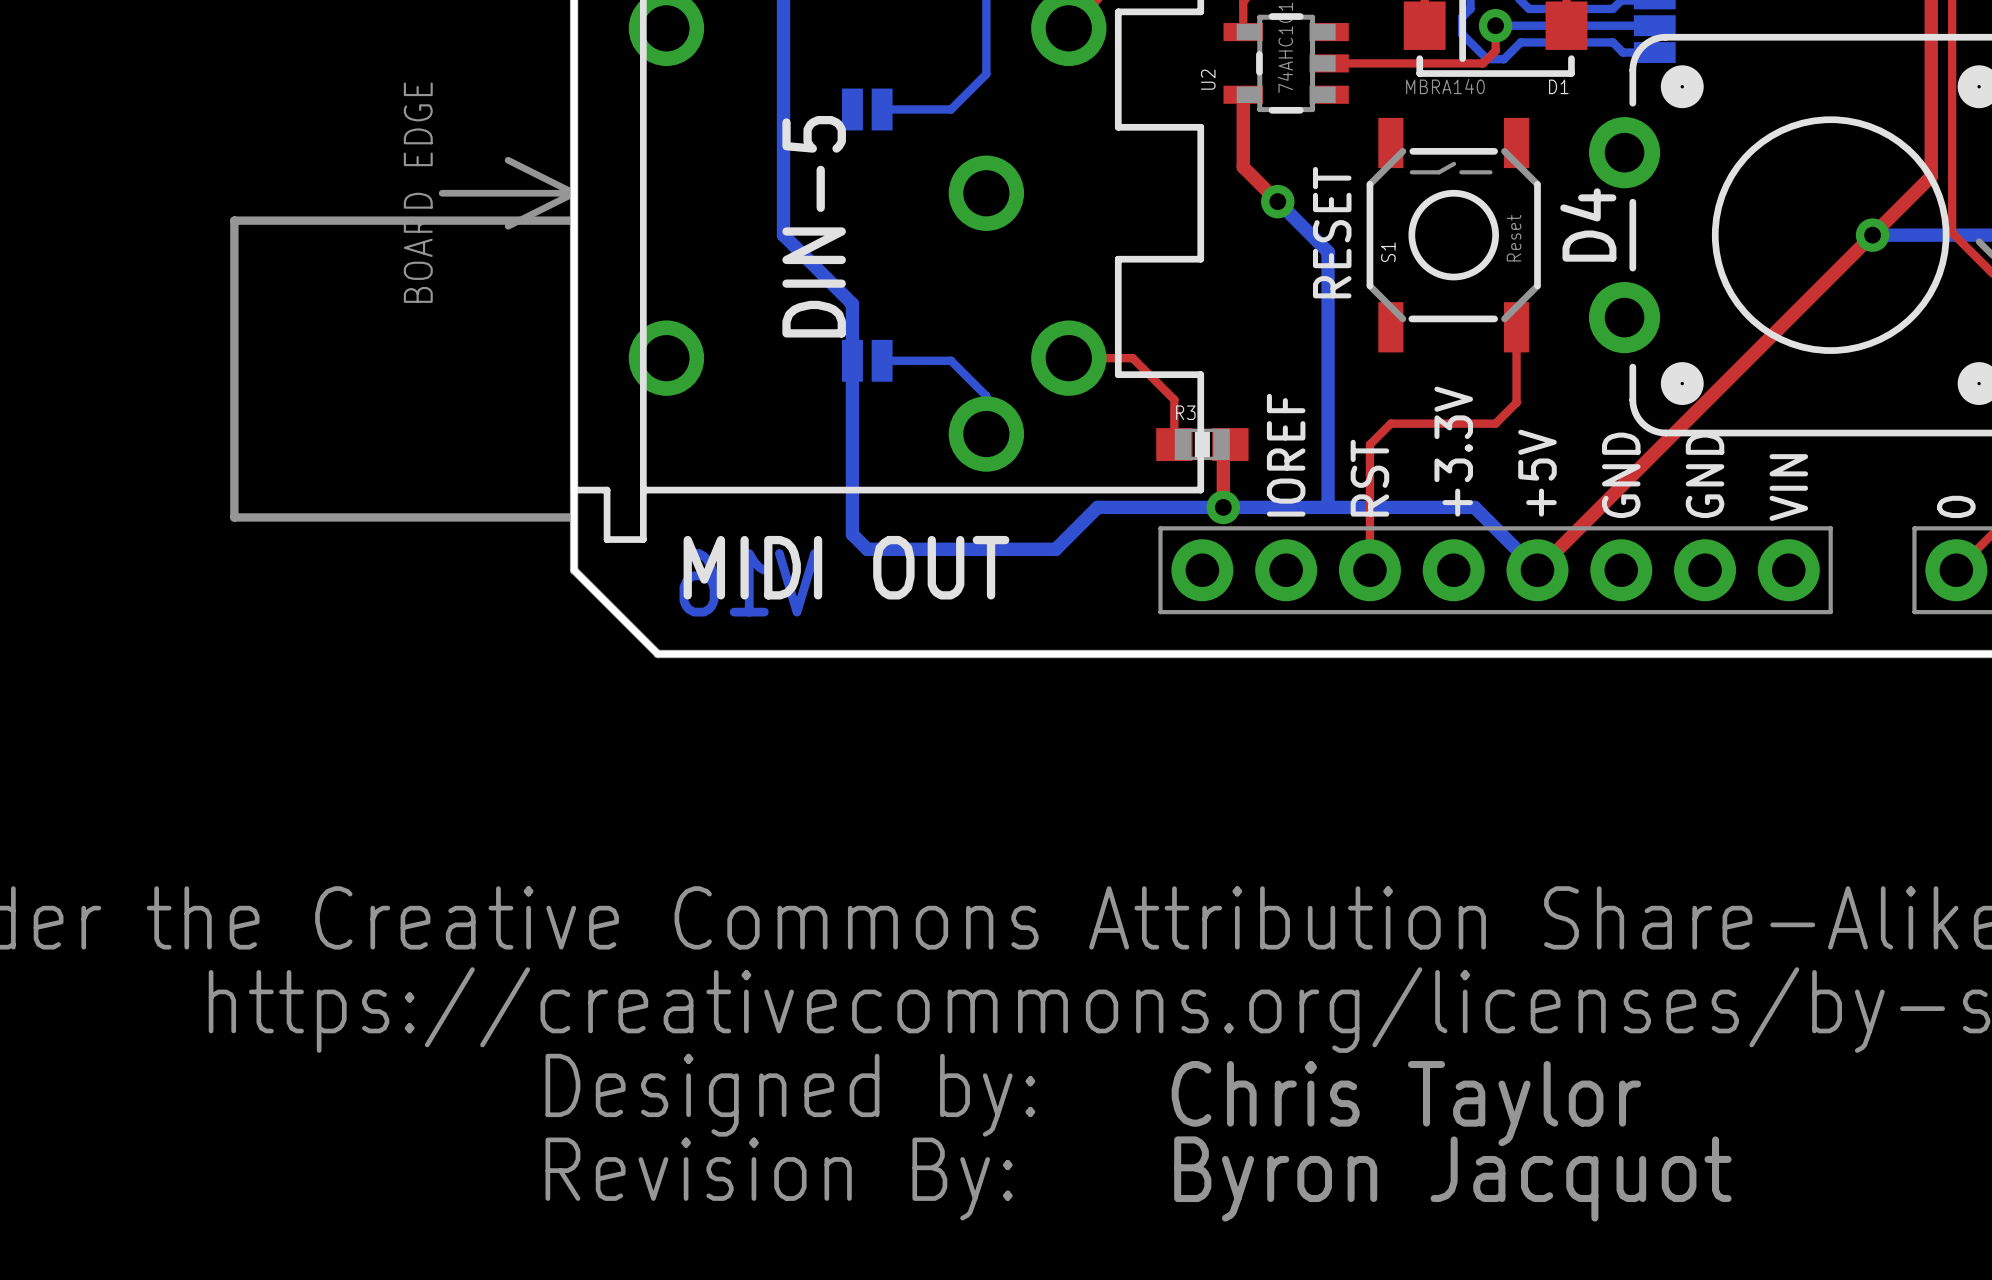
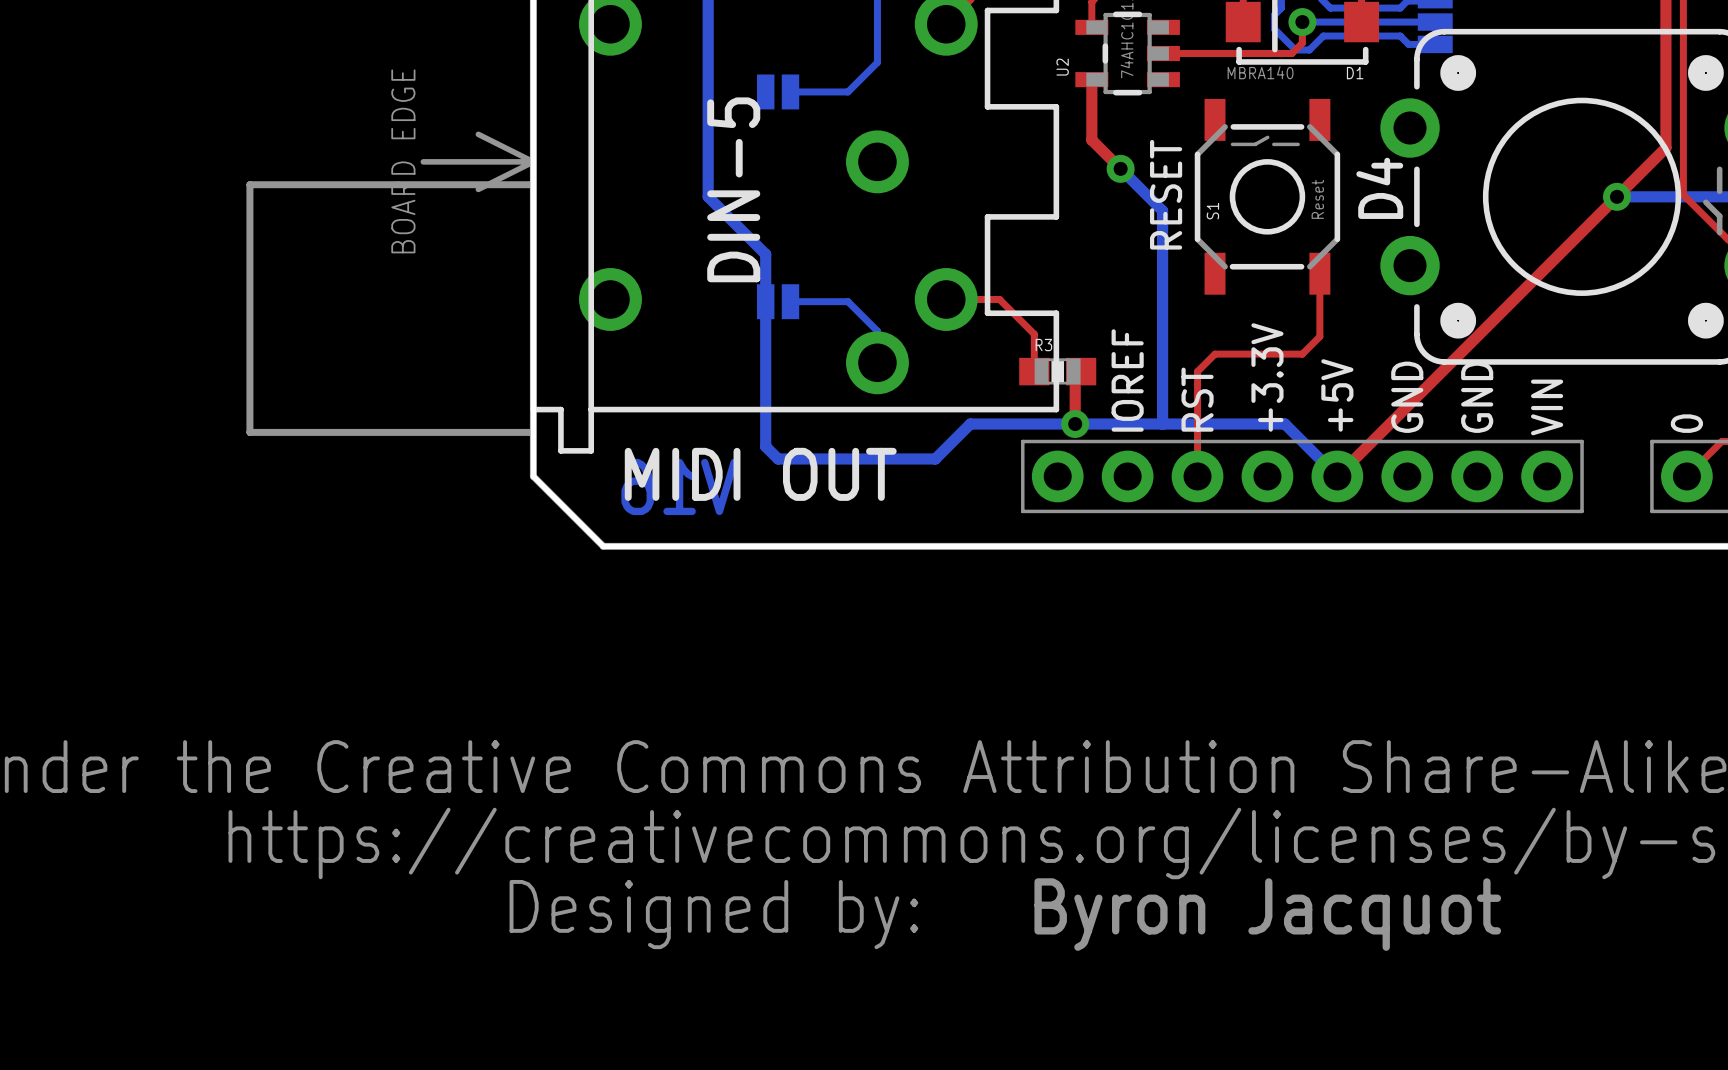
text: Chris Taylor (1406, 1103) -> Byron Jacquot (1267, 914)
drawing: [545, 1137, 1013, 1221] -> none
text: Byron Jacquot (1452, 1178) -> none

